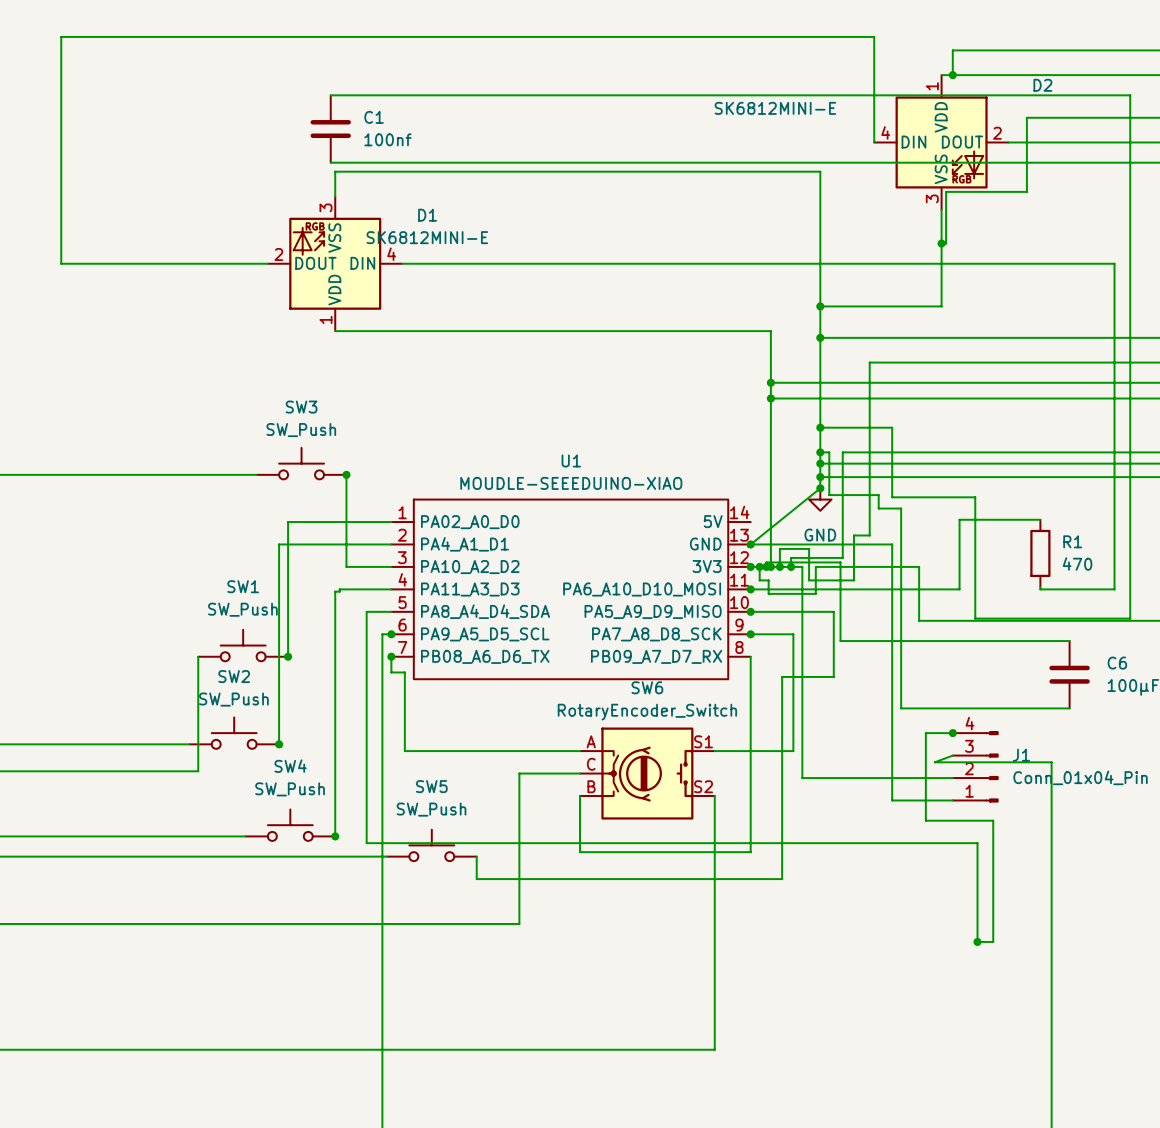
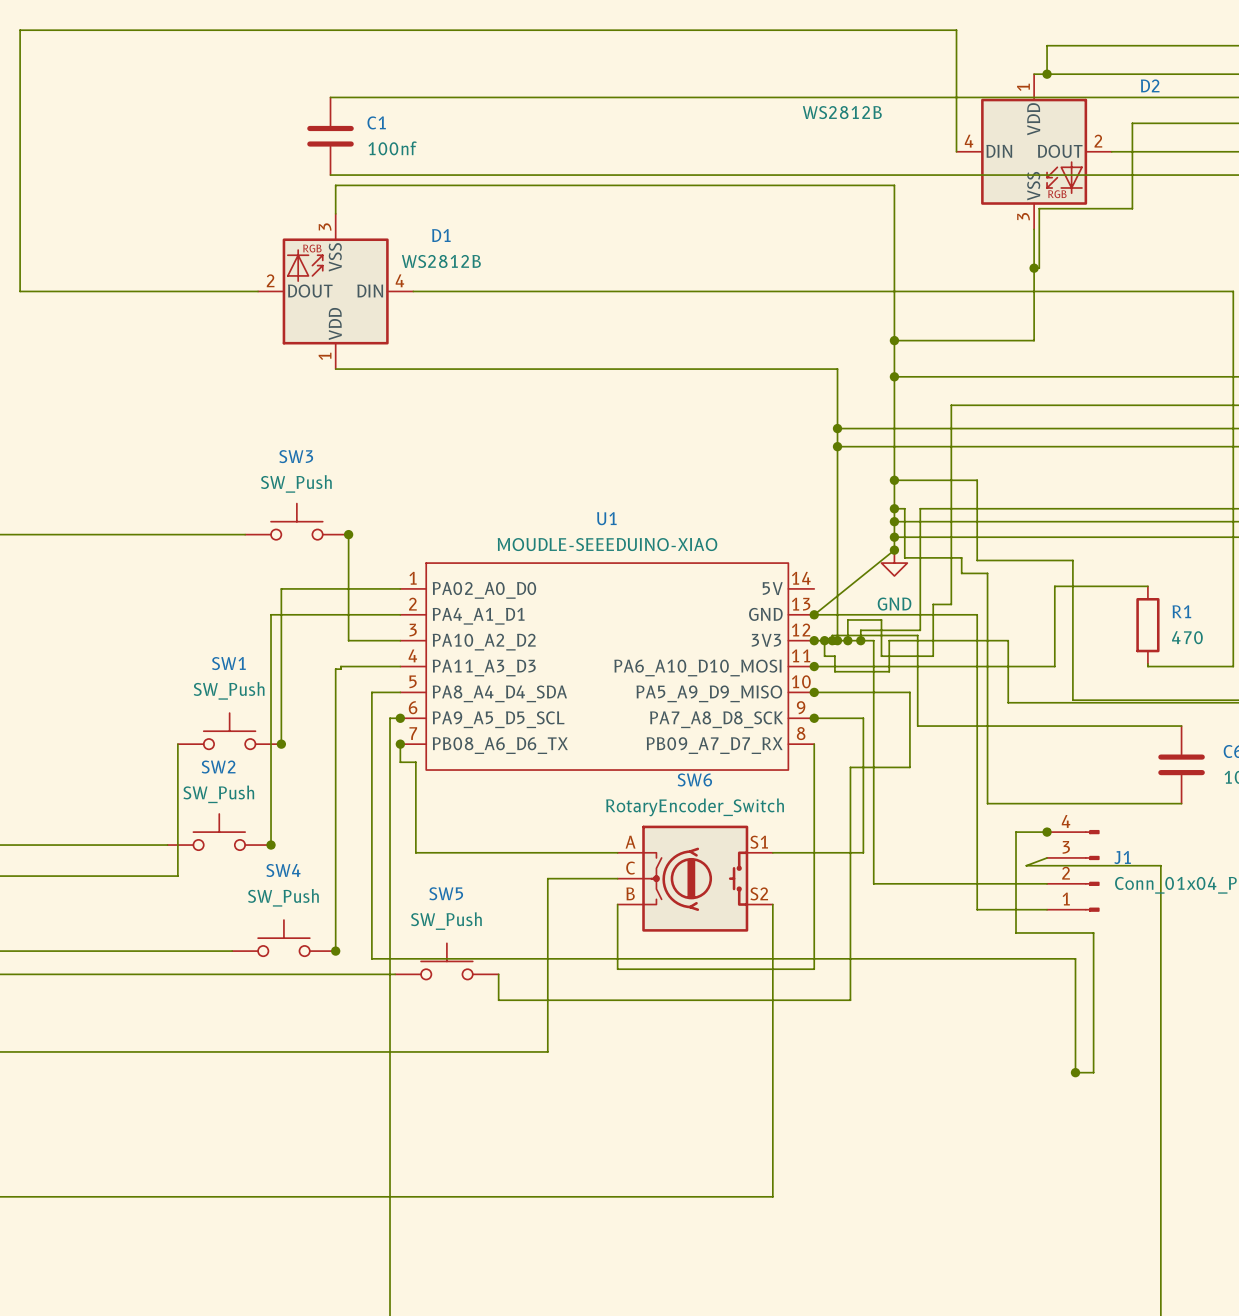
D2 value: SK6812MINI-E (775, 108) -> WS2812B (842, 112)
D1 value: SK6812MINI-E (427, 237) -> WS2812B (441, 261)

